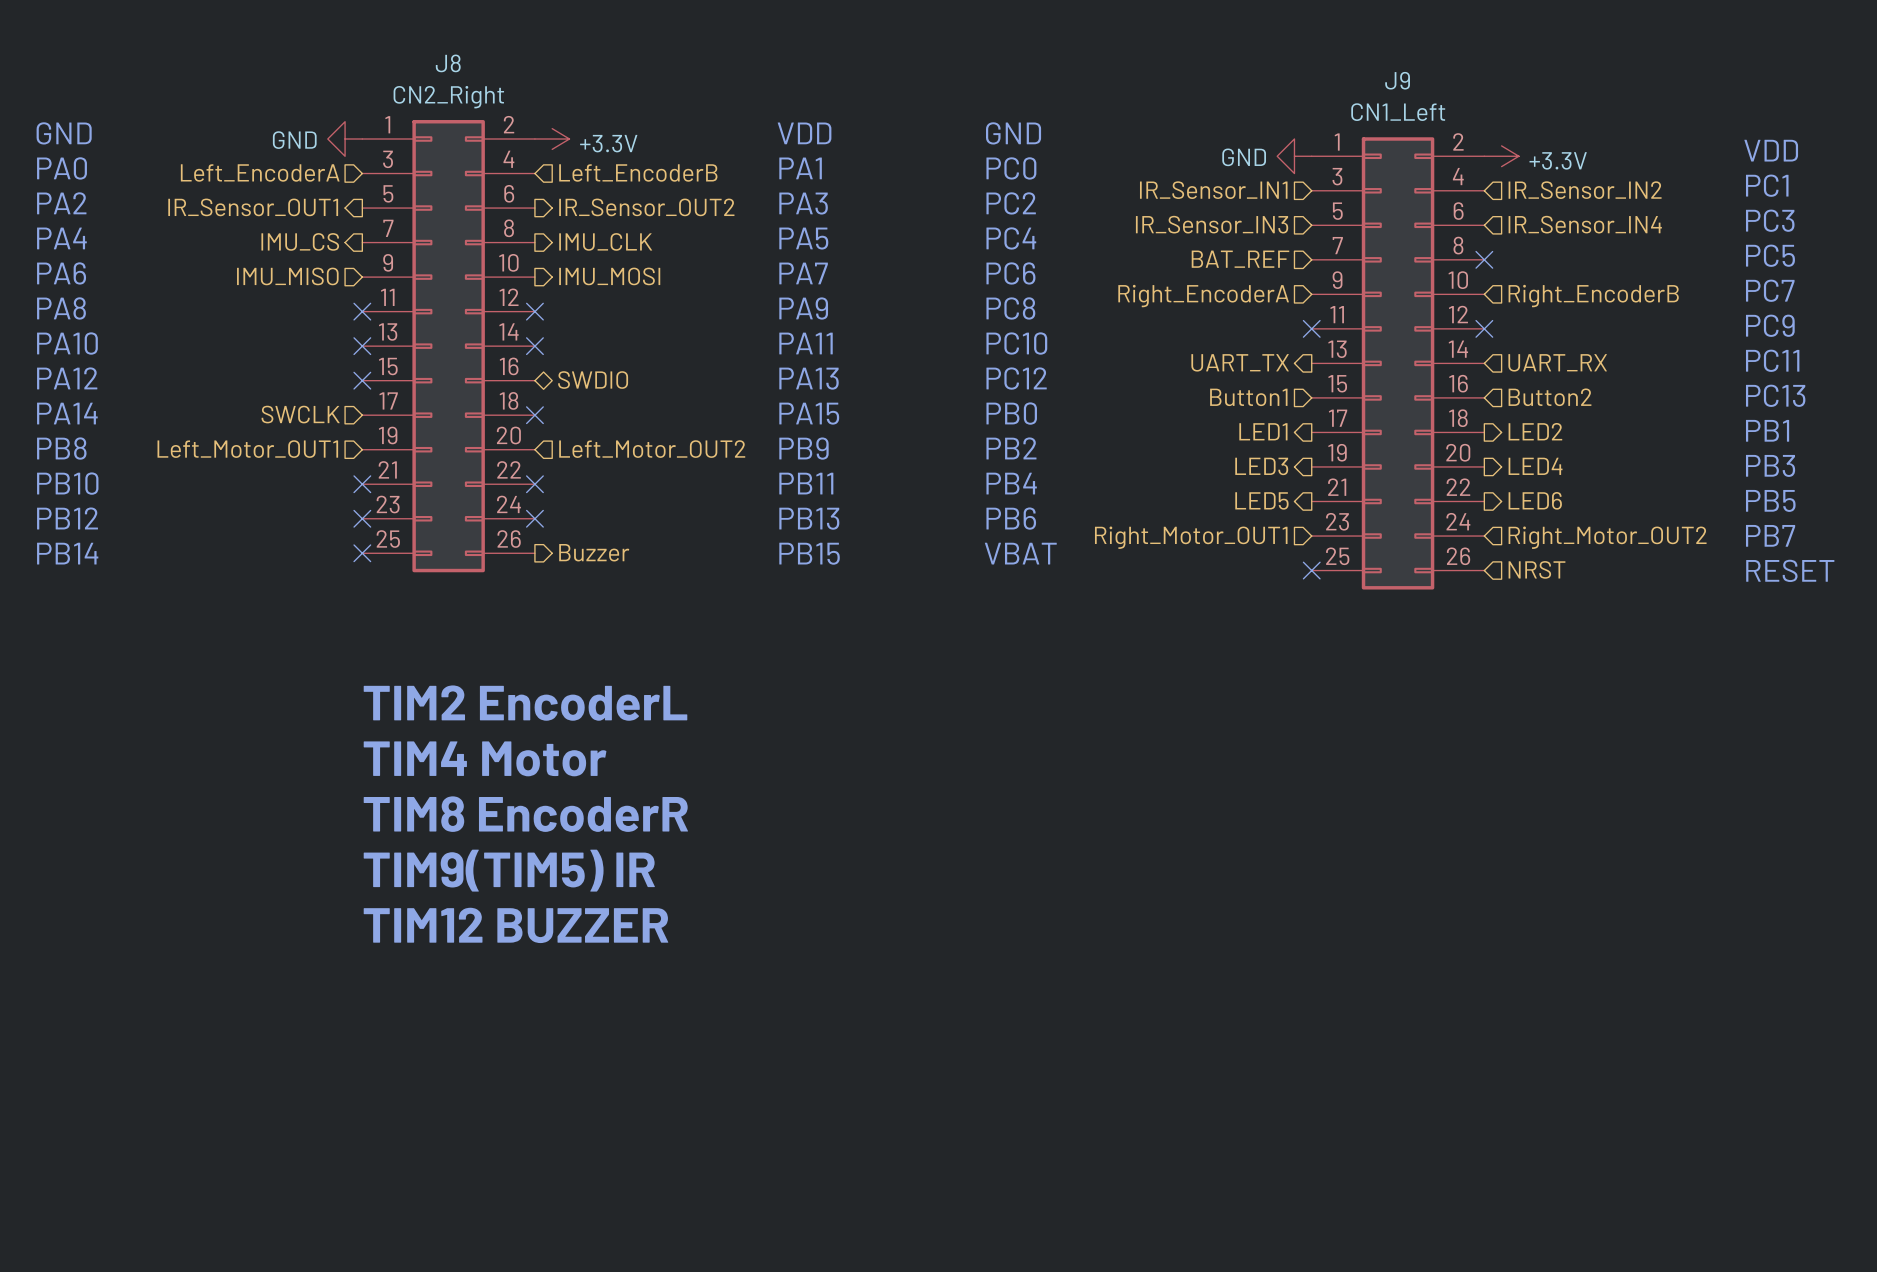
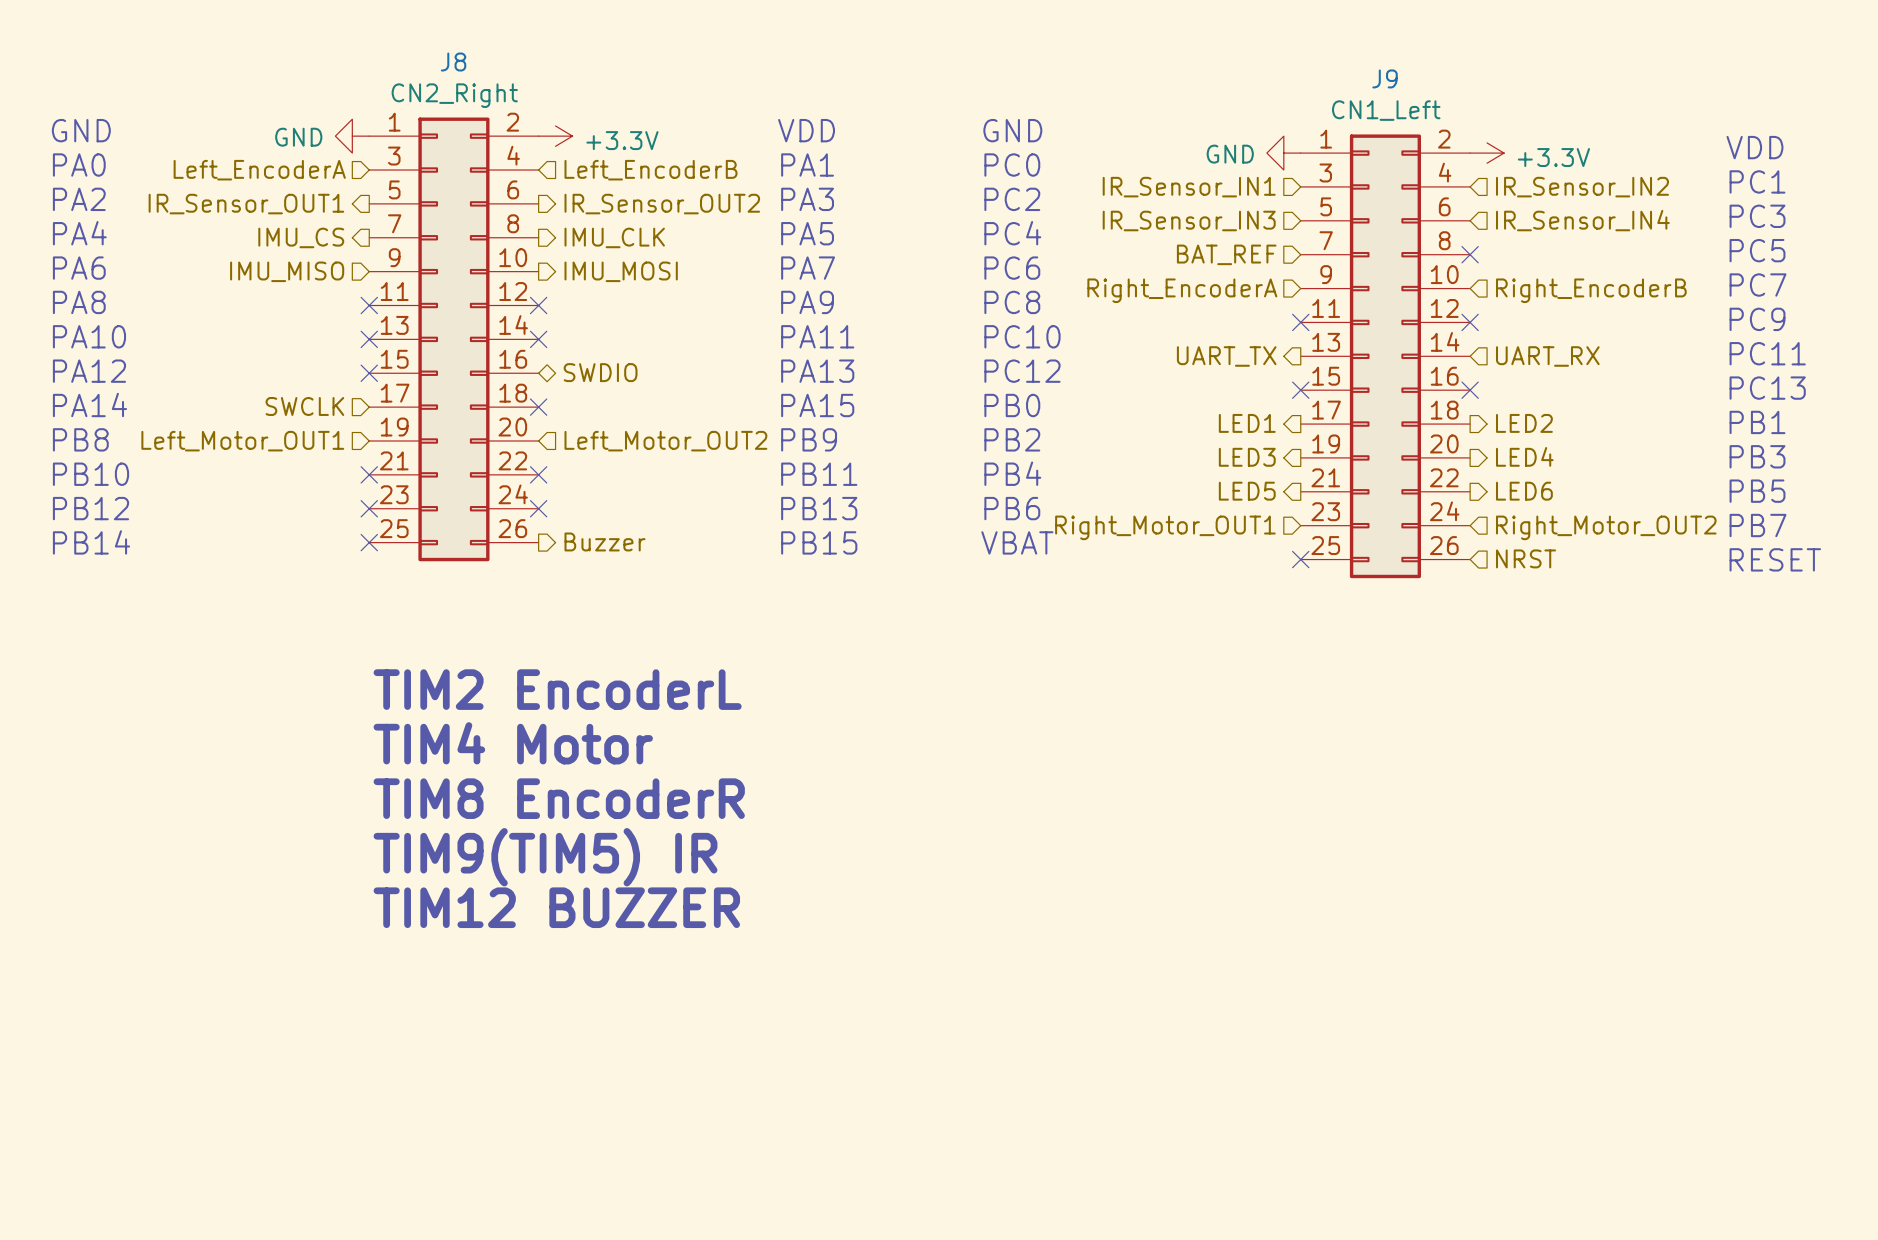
hierarchical label: Button1 (1248, 397) -> none
no-connect mark: none -> (1300, 390)
no-connect mark: none -> (1470, 390)
hierarchical label: Button2 (1550, 397) -> none

